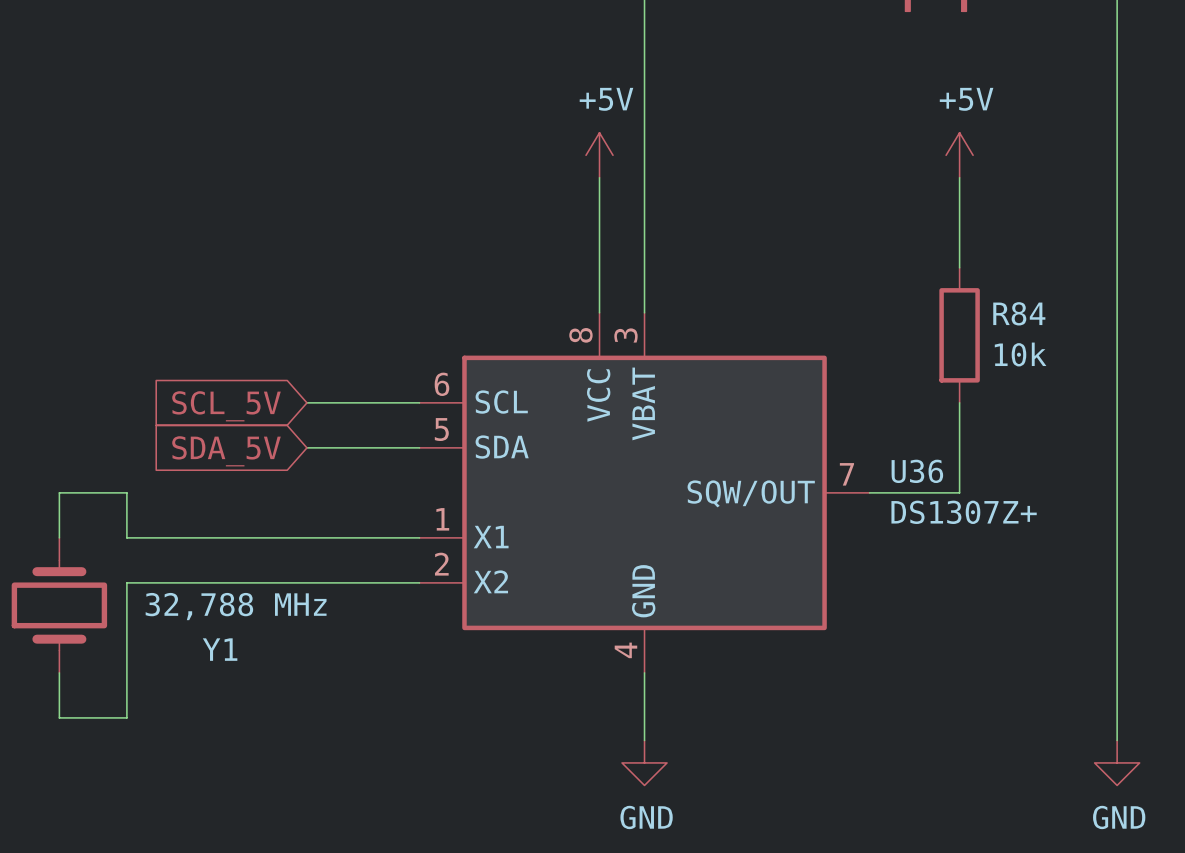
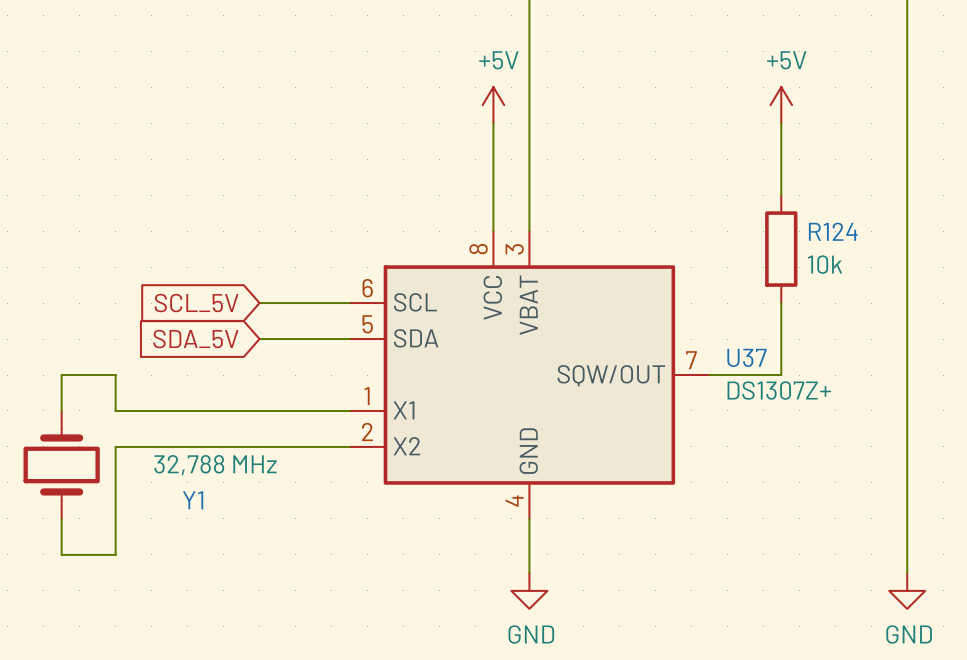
R84 name: R84 (1019, 313) -> R124 (833, 231)
U36 name: U36 (917, 471) -> U37 (747, 357)

